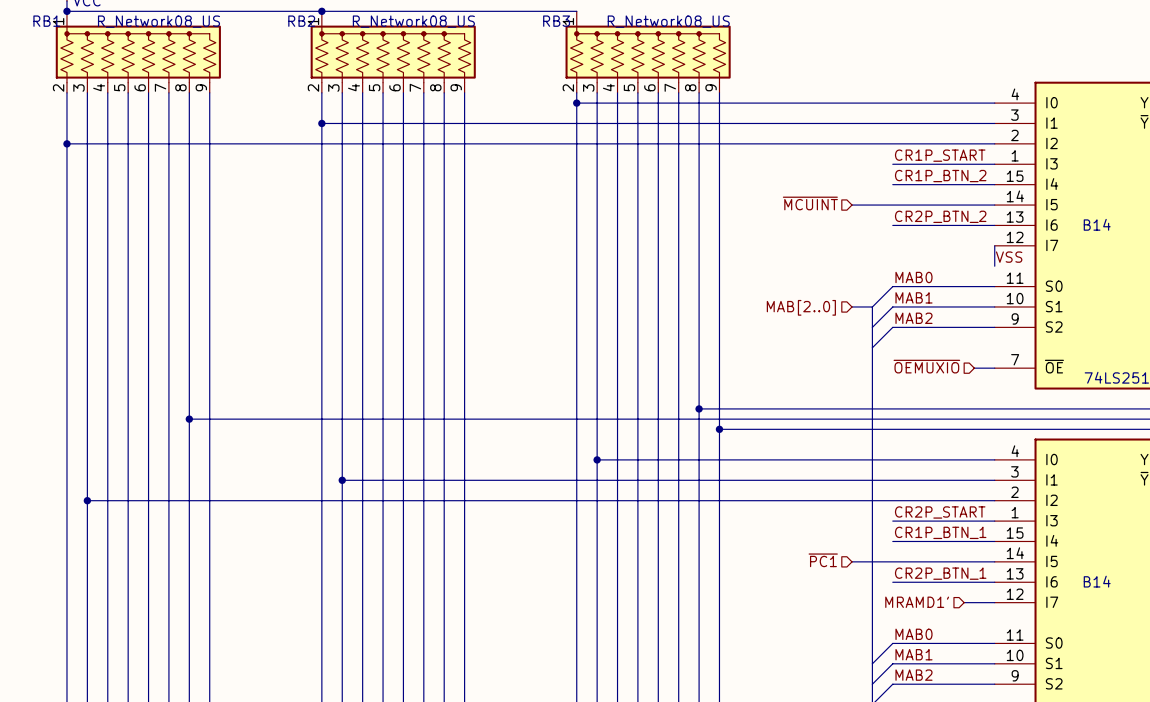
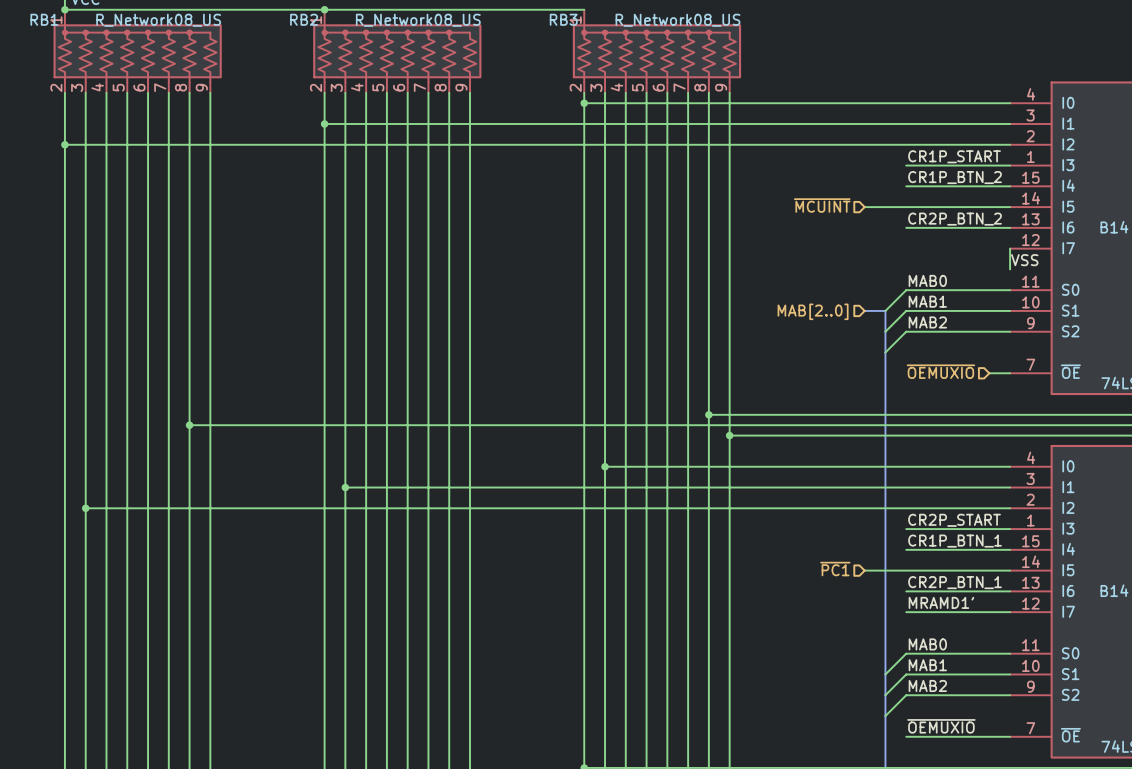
label: none -> MRAMD1' (941, 602)
wire: none -> (906, 612) (978, 612)
hierarchical label: MRAMD1' (917, 602) -> none

